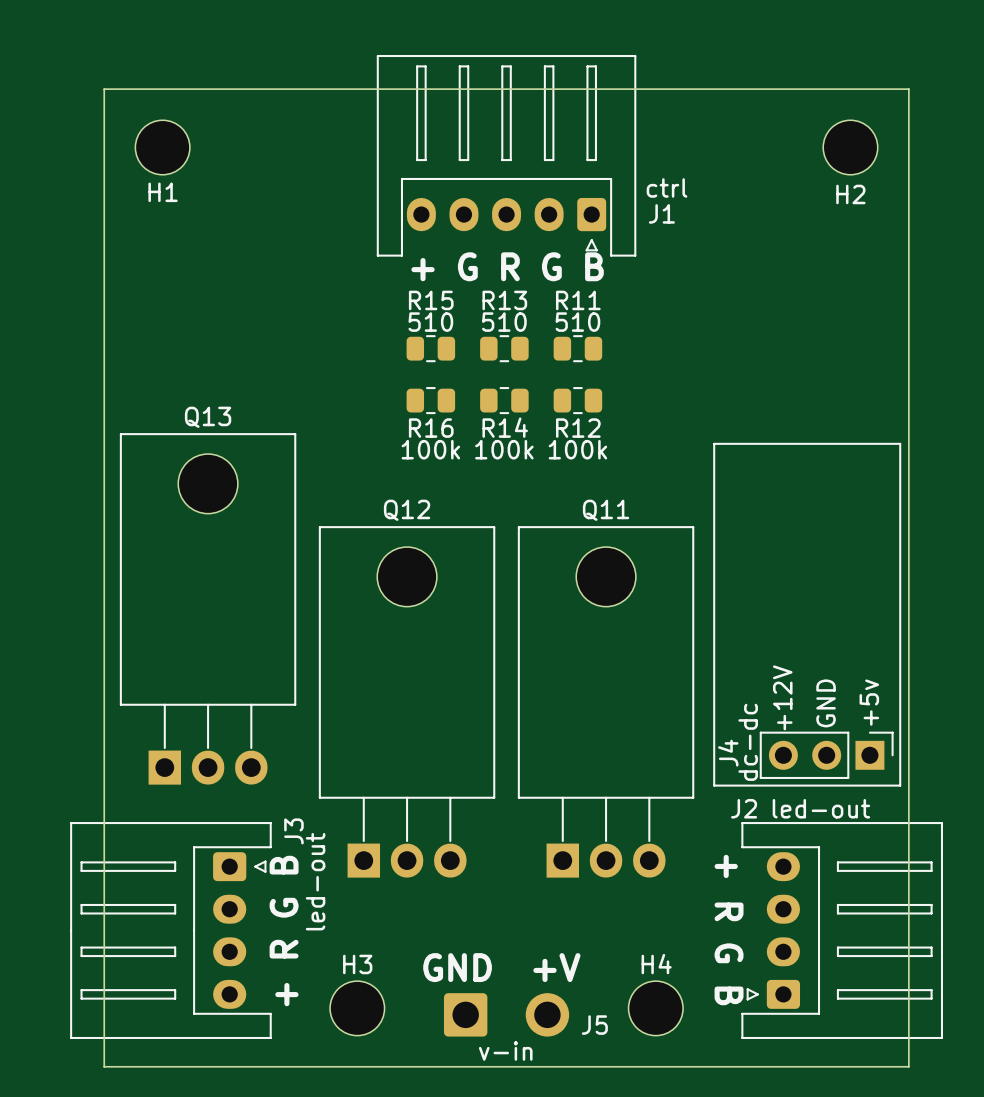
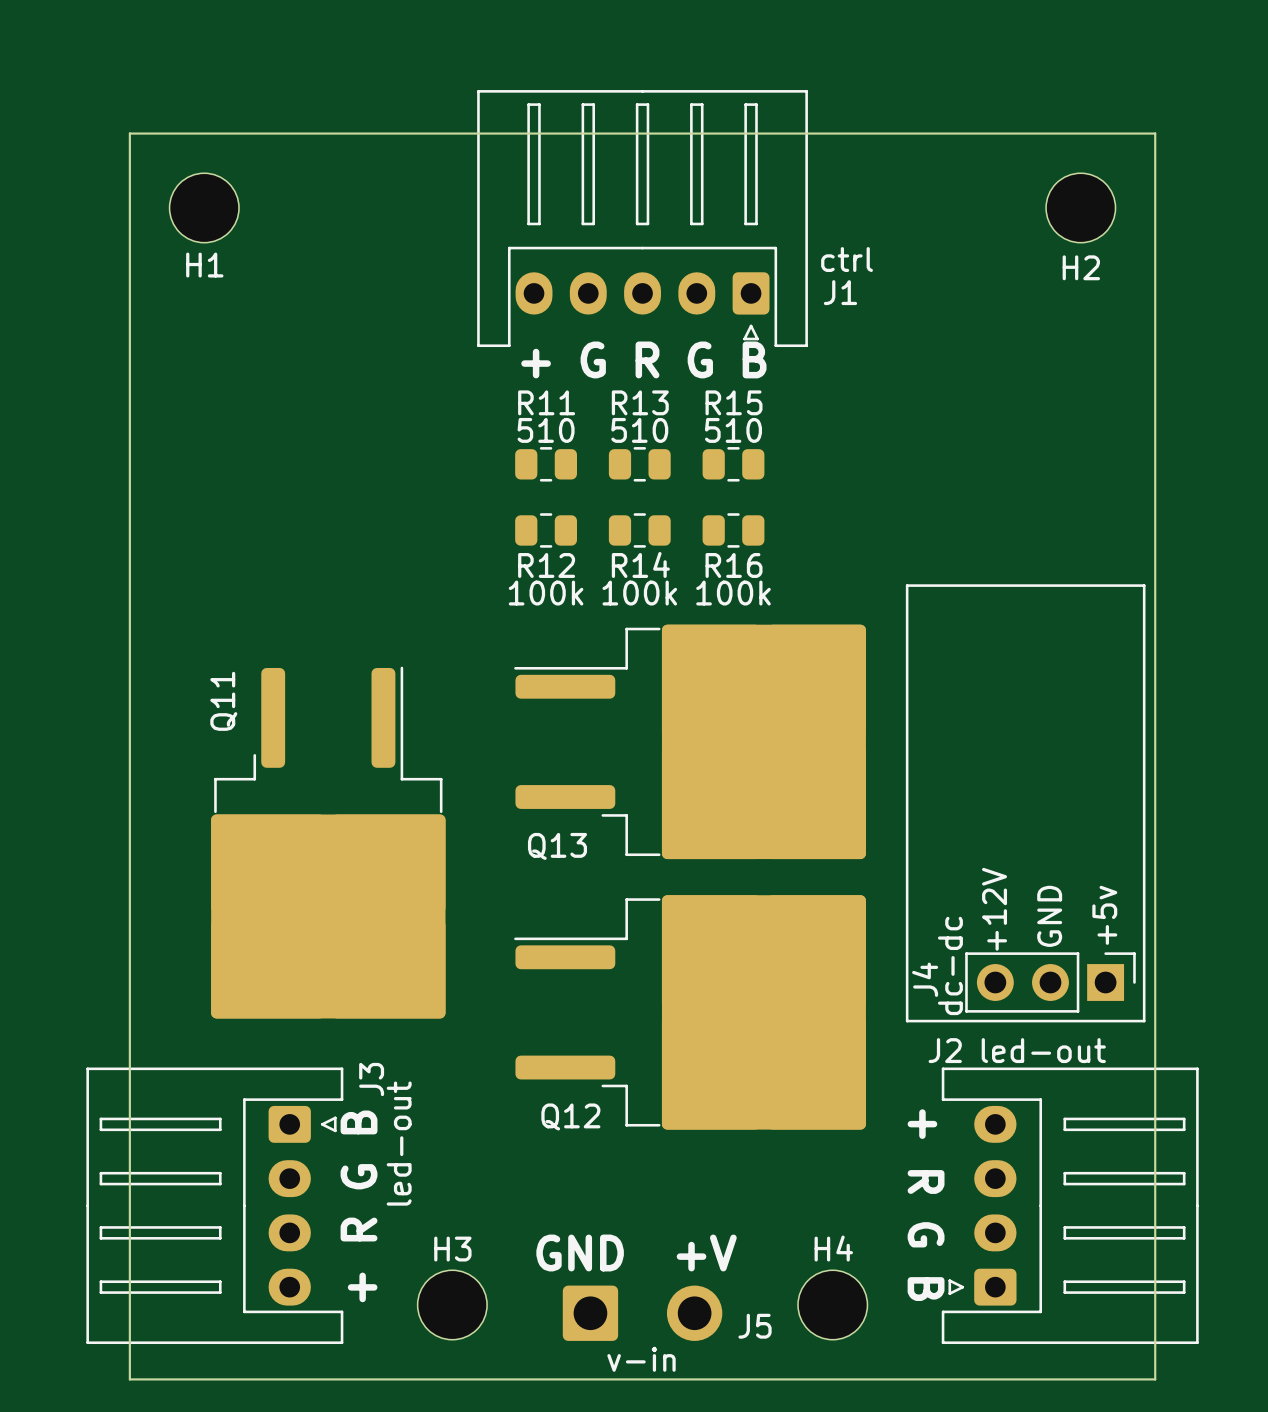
R15 name: R15 (431, 300) -> R11 (546, 402)
R11 name: R11 (578, 300) -> R15 (734, 402)
Q13 name position: Q13 (208, 417) -> Q13 (557, 846)
R16 name: R16 (431, 428) -> R12 (546, 565)
R12 name: R12 (578, 428) -> R16 (734, 565)
Q13 footprint: [119, 433, 297, 785] -> [514, 624, 866, 860]
Q12 name position: Q12 (407, 510) -> Q12 (570, 1116)
Q11 name position: Q11 (606, 510) -> Q11 (223, 701)
Q12 footprint: [318, 526, 496, 878] -> [514, 895, 866, 1130]
Q11 footprint: [517, 526, 695, 878] -> [211, 666, 446, 1019]

